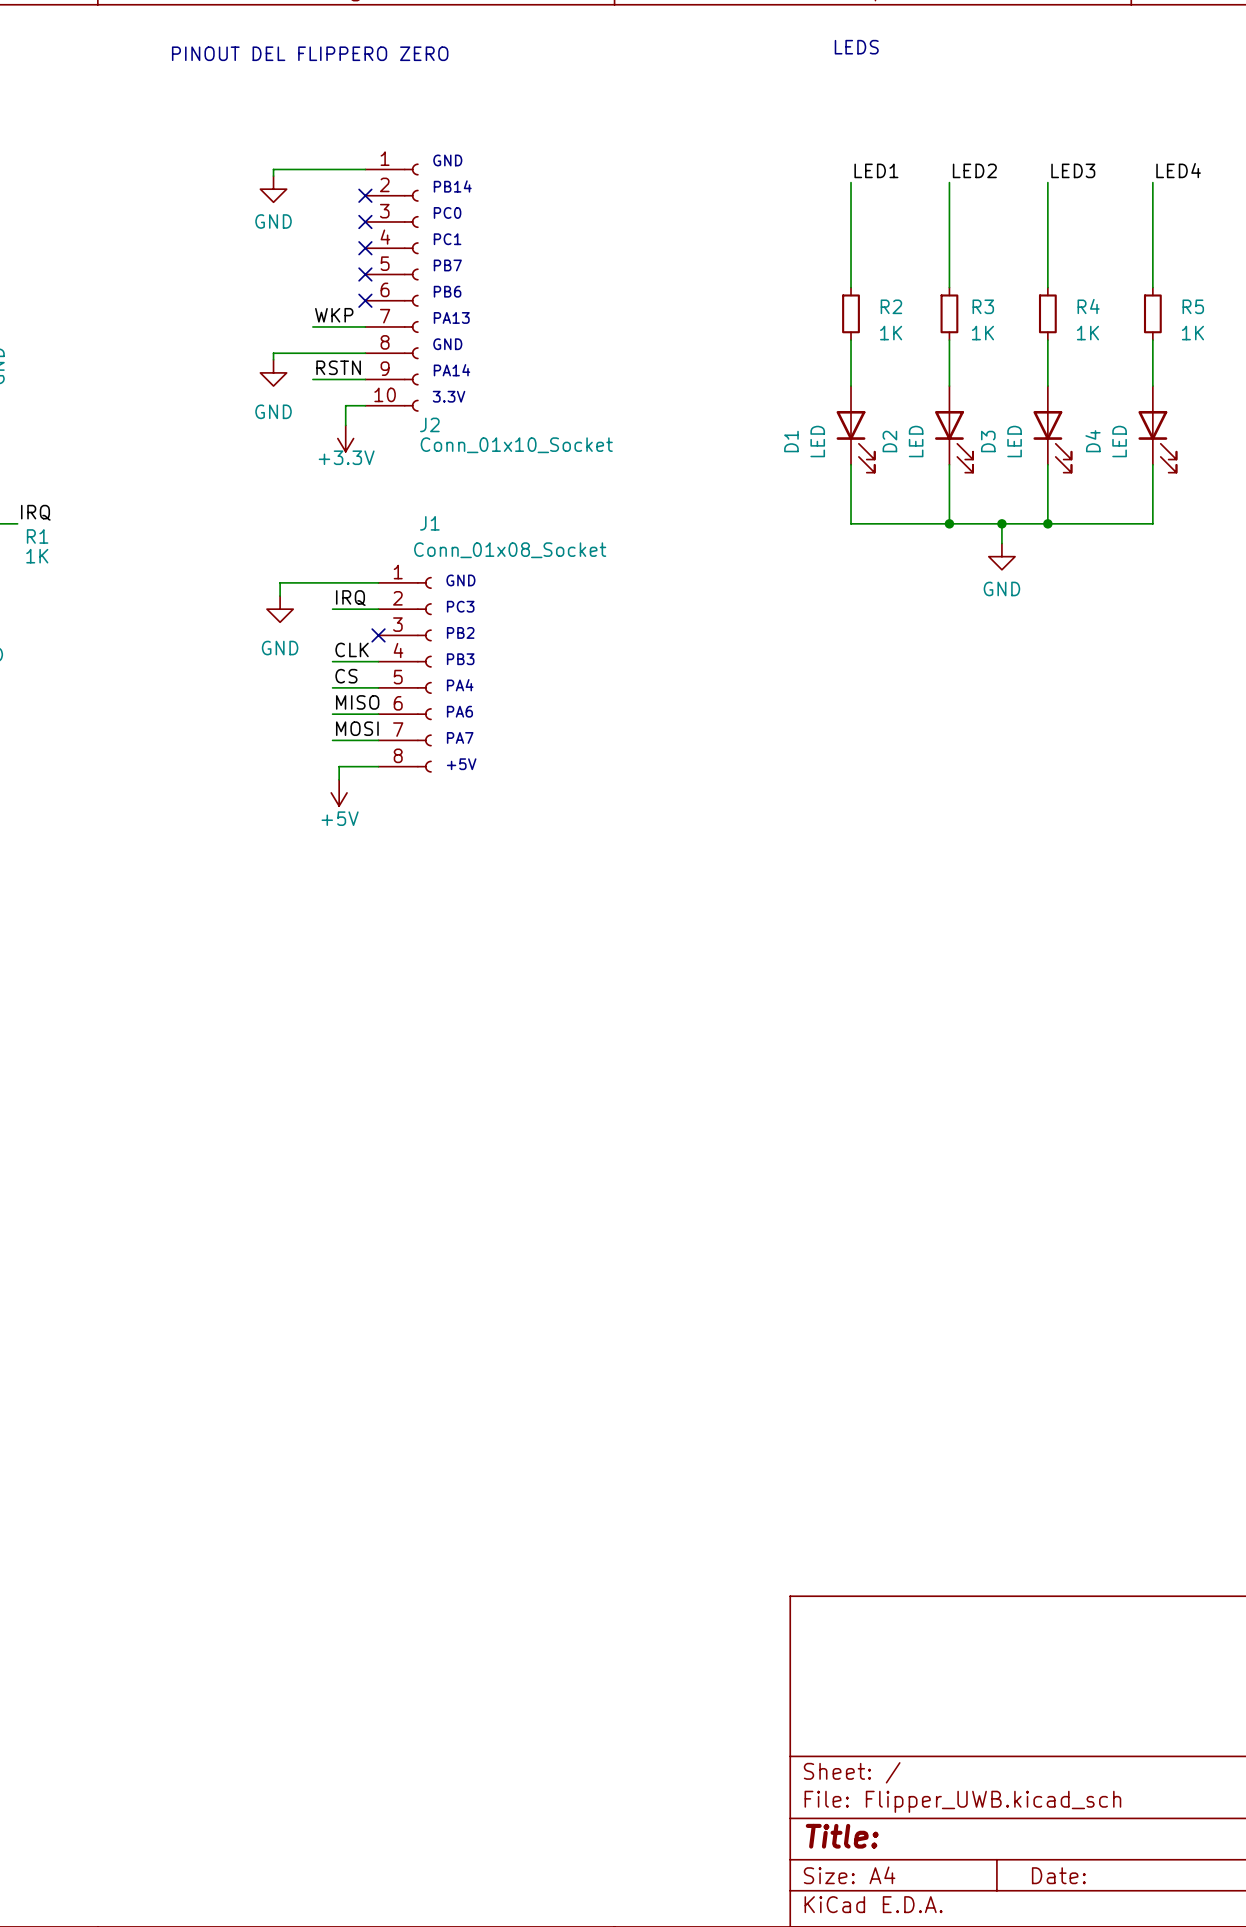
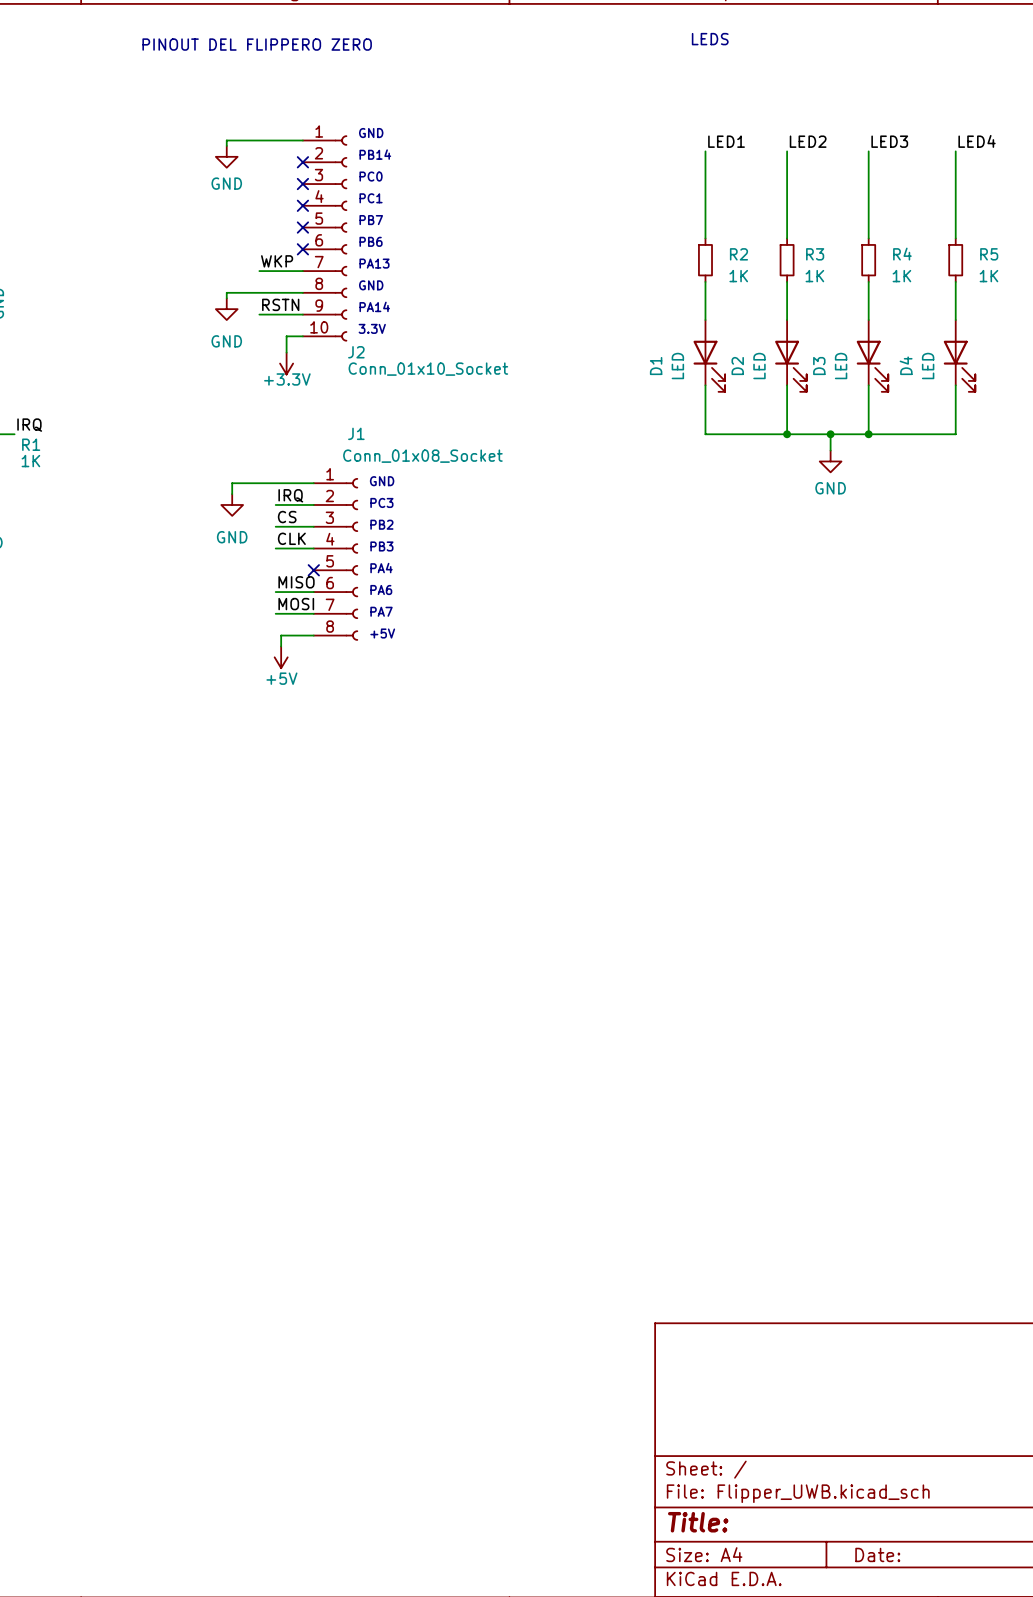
no-connect mark position: (378, 635) -> (313, 570)
label position: CS (346, 676) -> CS (287, 517)
wire: (332, 687) (378, 687) -> (275, 526) (313, 526)

